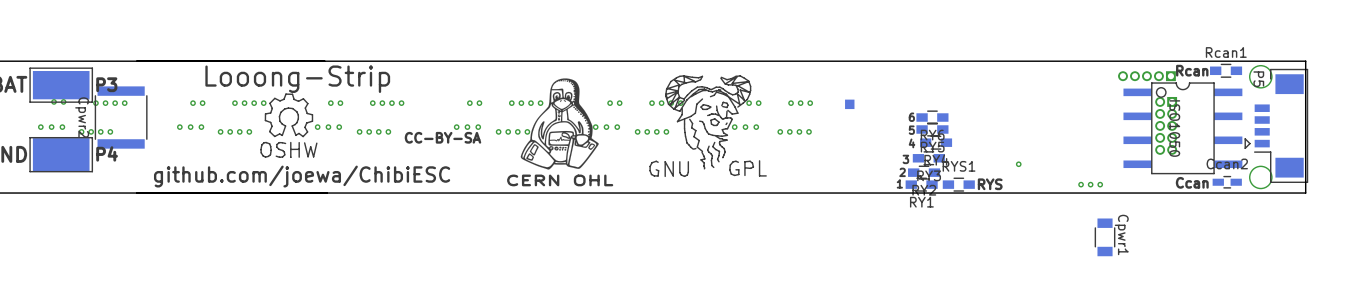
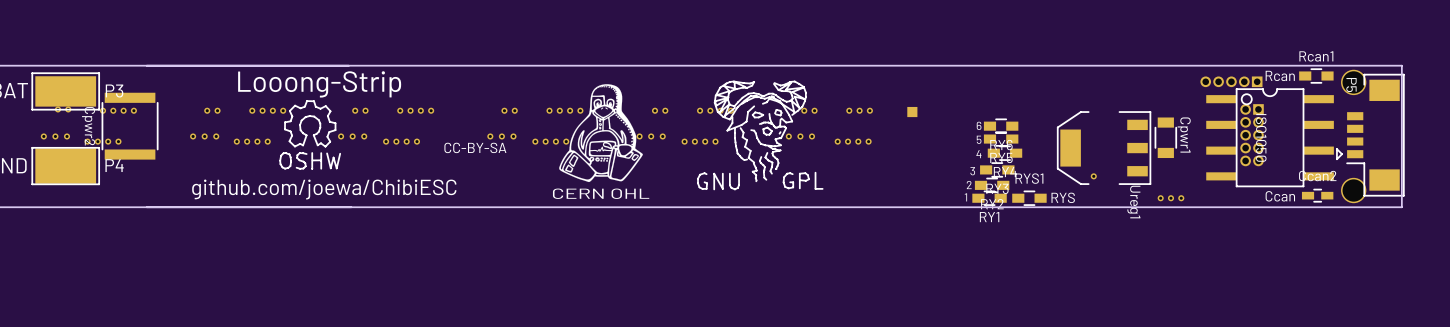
Ureg1: none -> (1104, 148)
Cpwr1 position: (1105, 237) -> (1165, 137)

